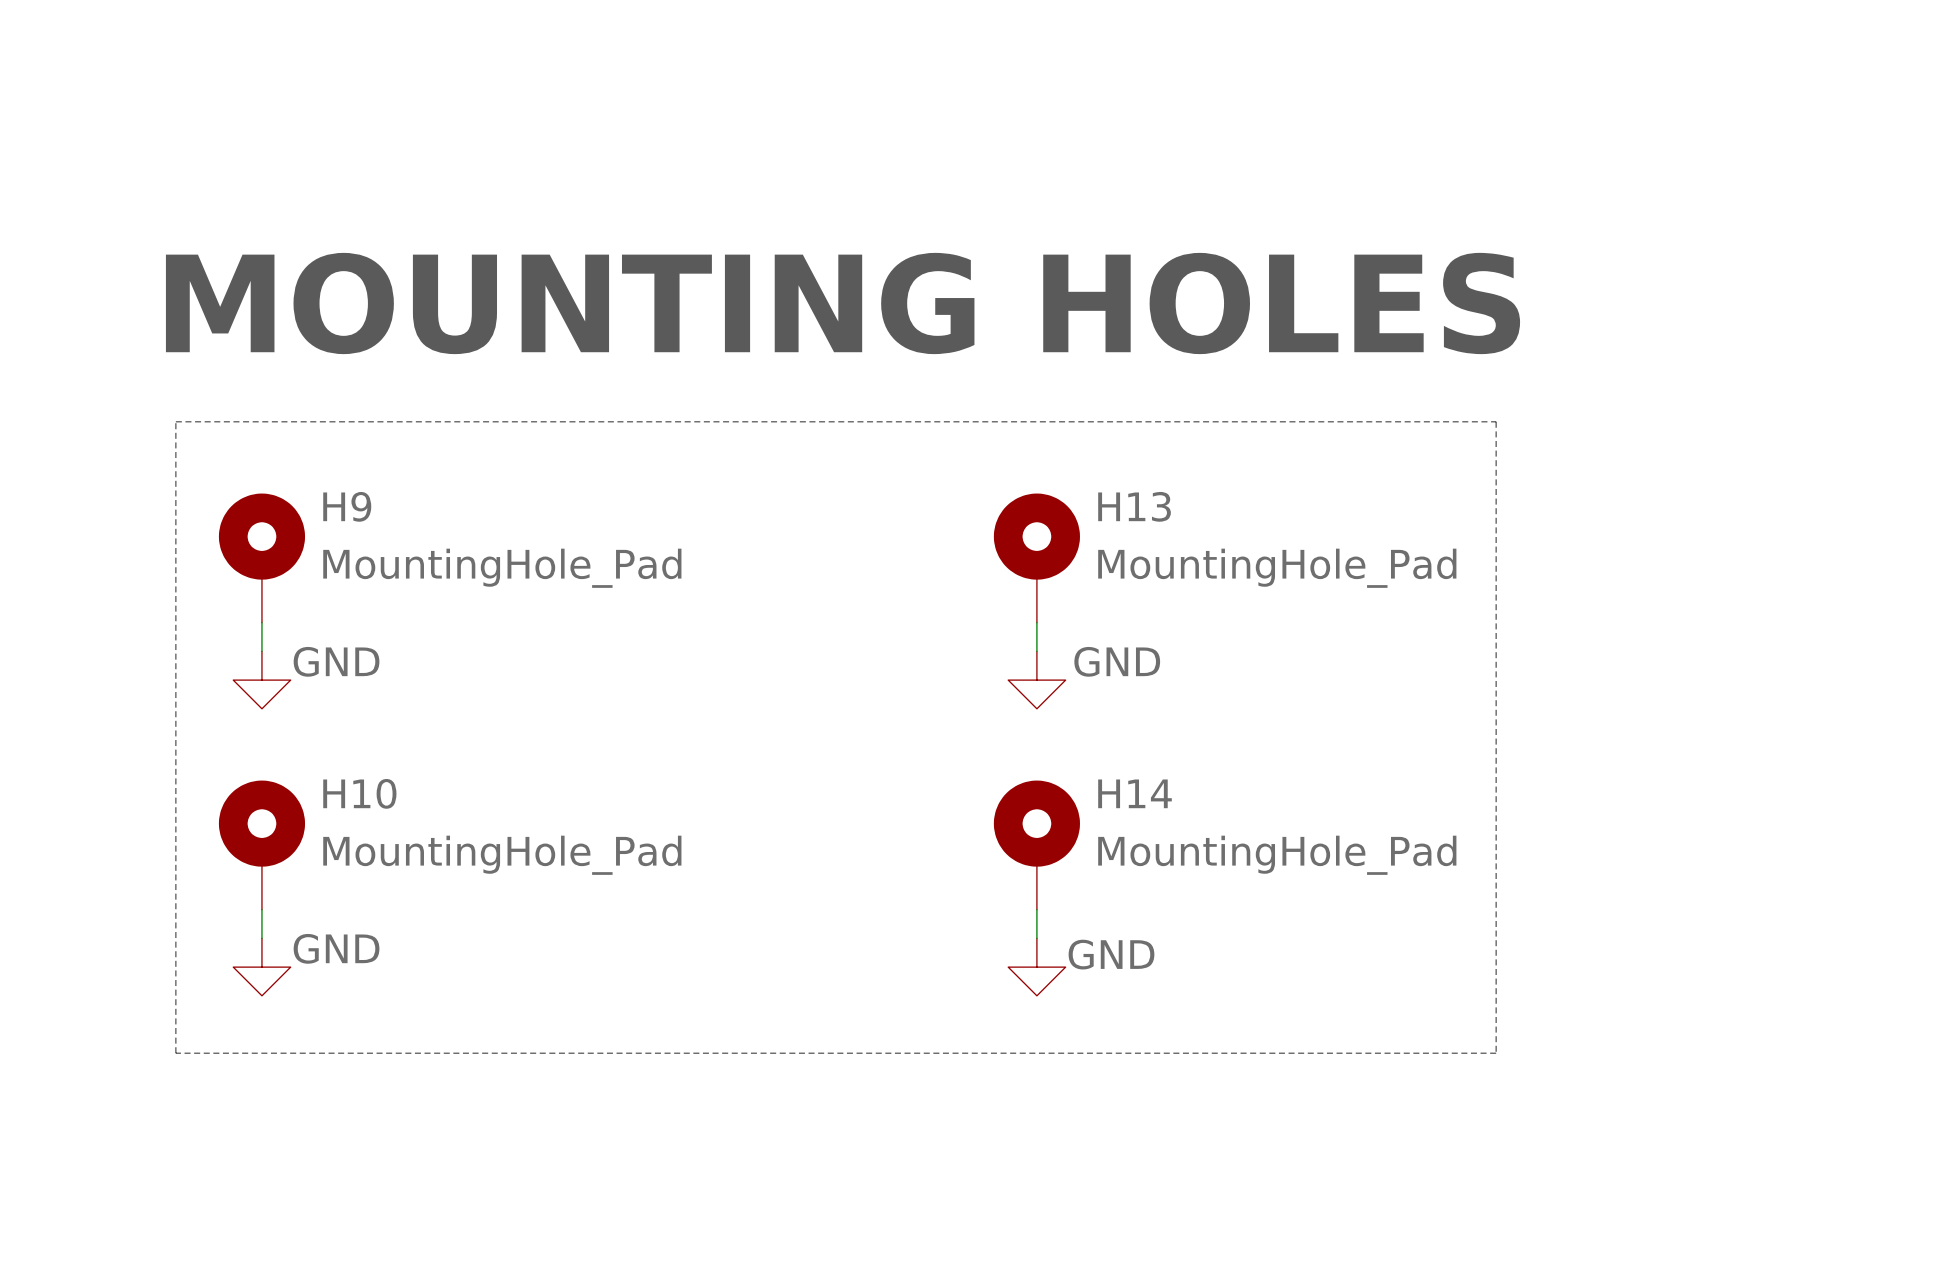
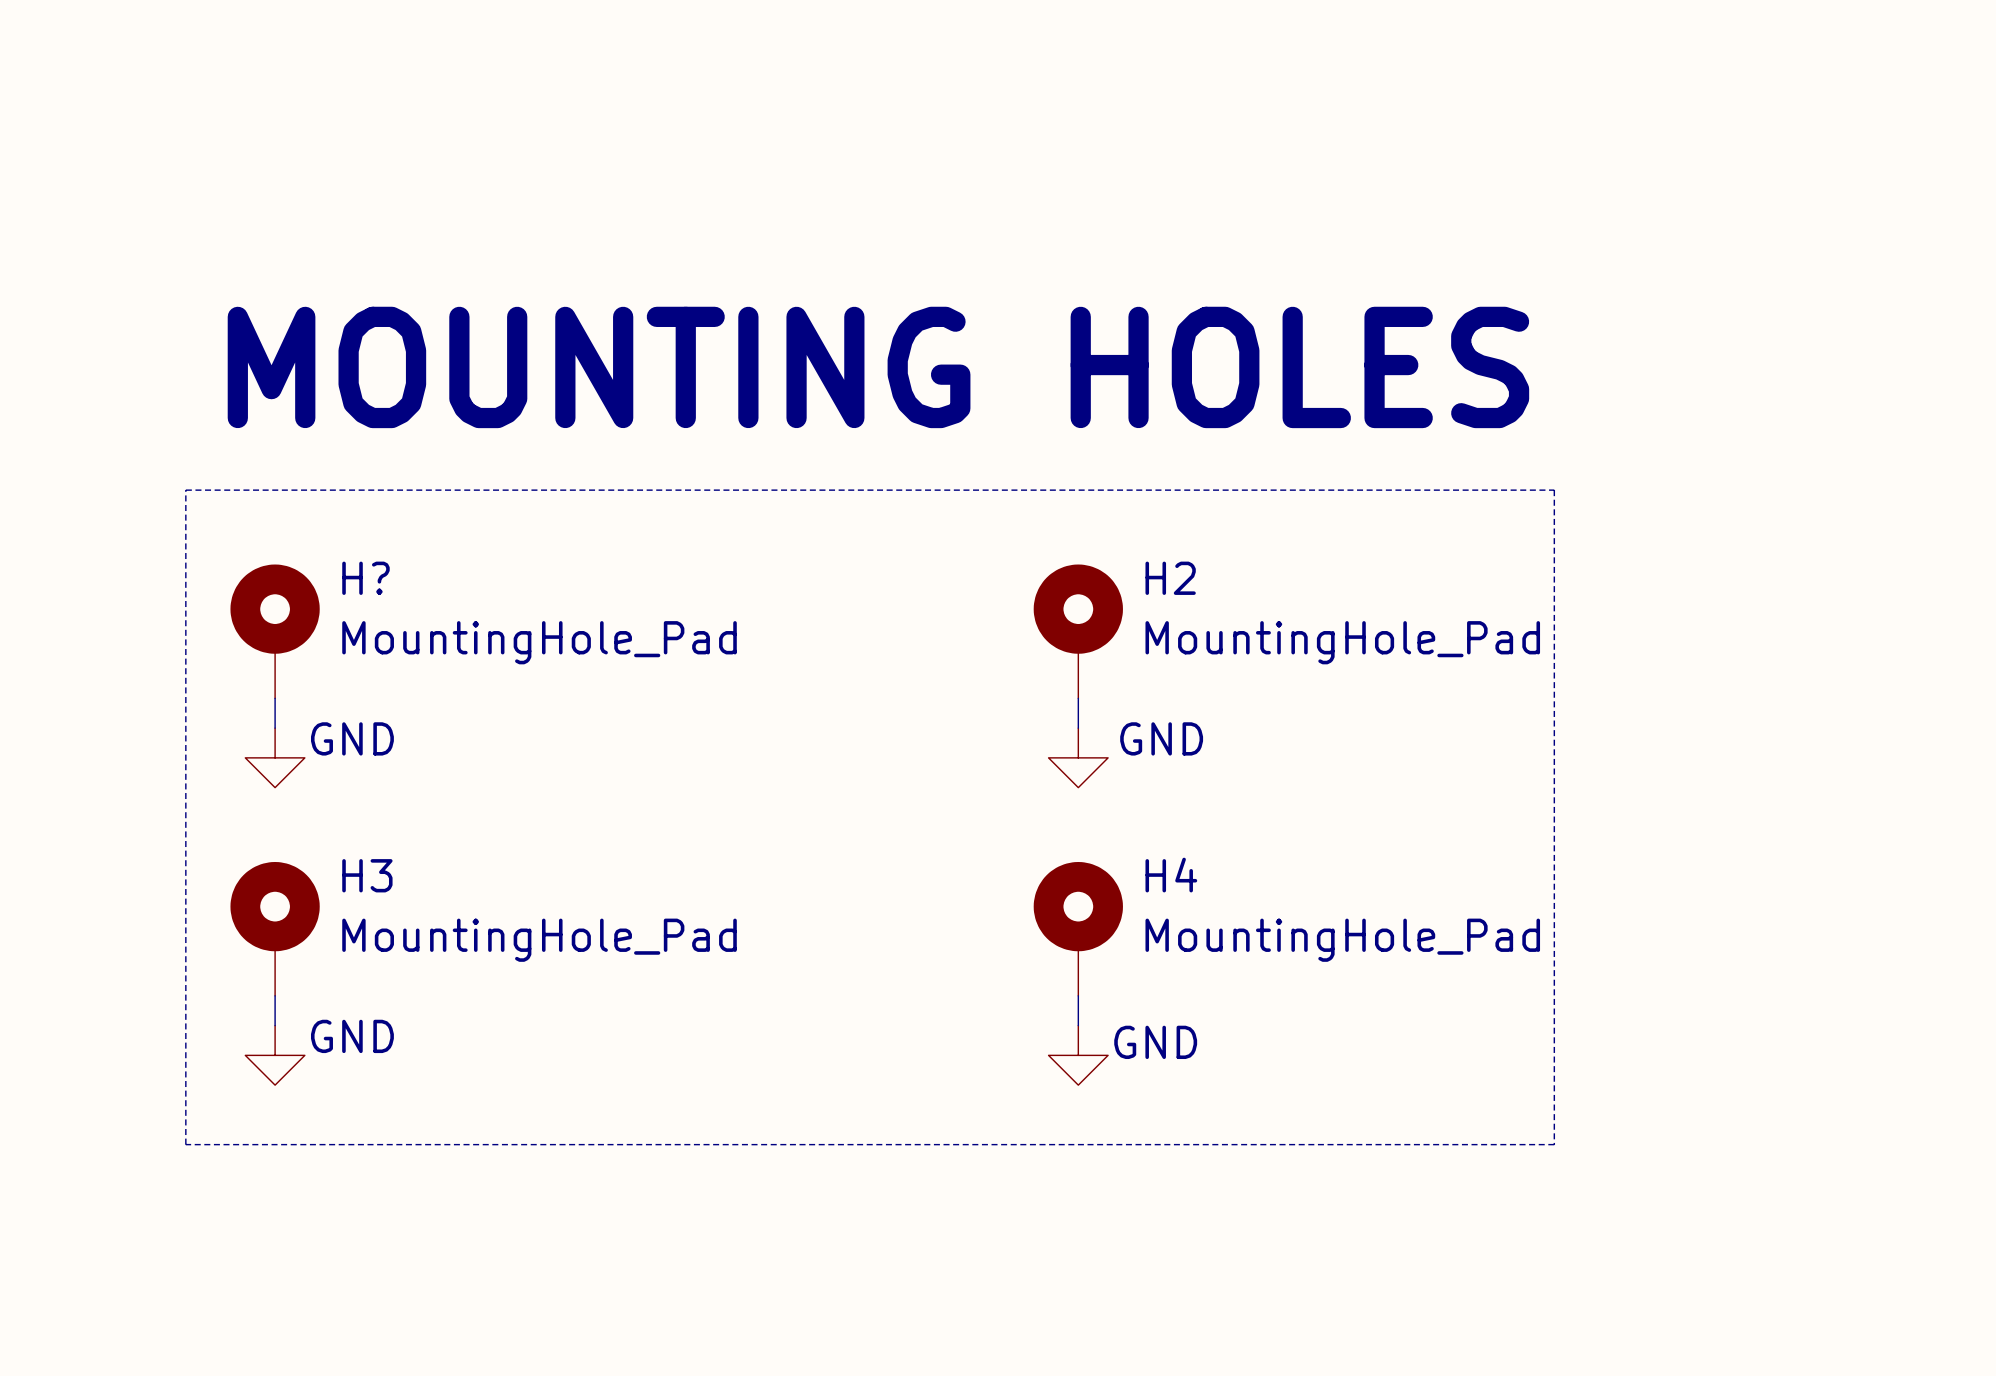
H9 name: H9 (347, 506) -> H? (365, 578)
H13 name: H13 (1134, 506) -> H2 (1170, 578)
H10 name: H10 (359, 793) -> H3 (367, 875)
H14 name: H14 (1135, 793) -> H4 (1171, 875)

